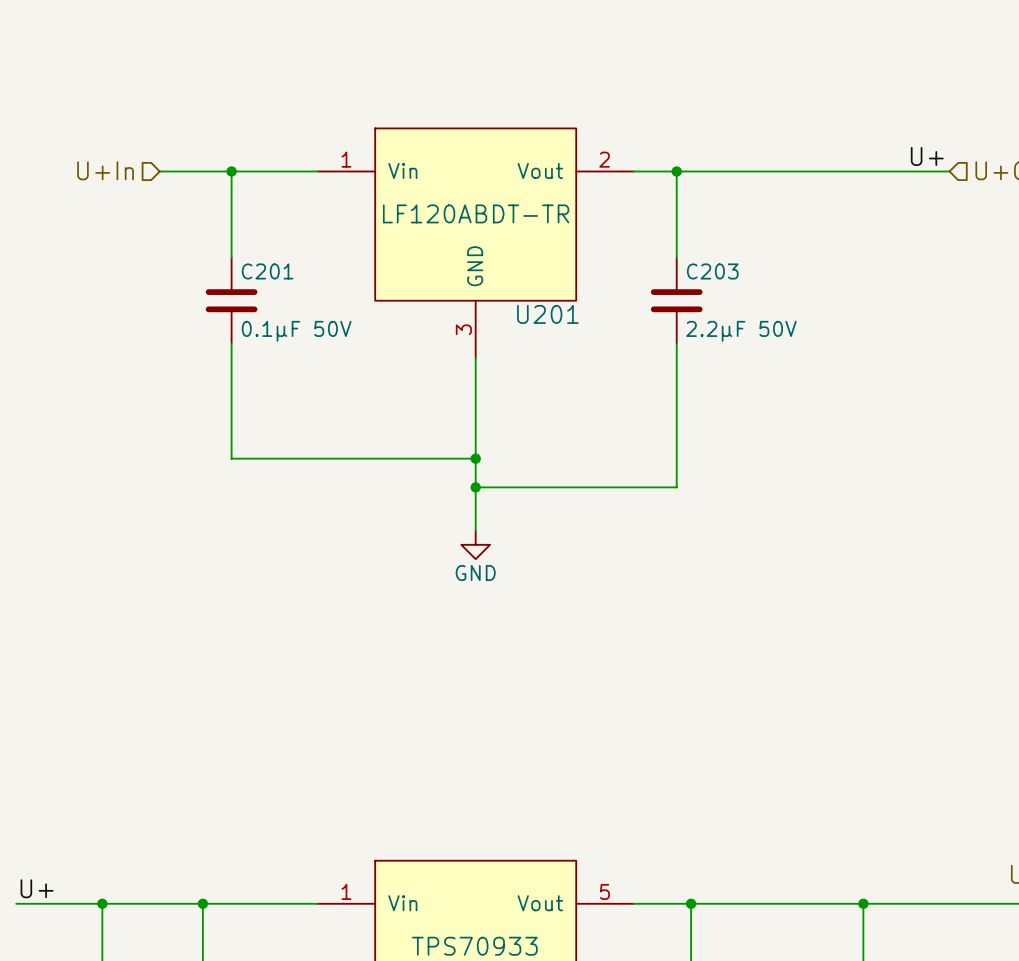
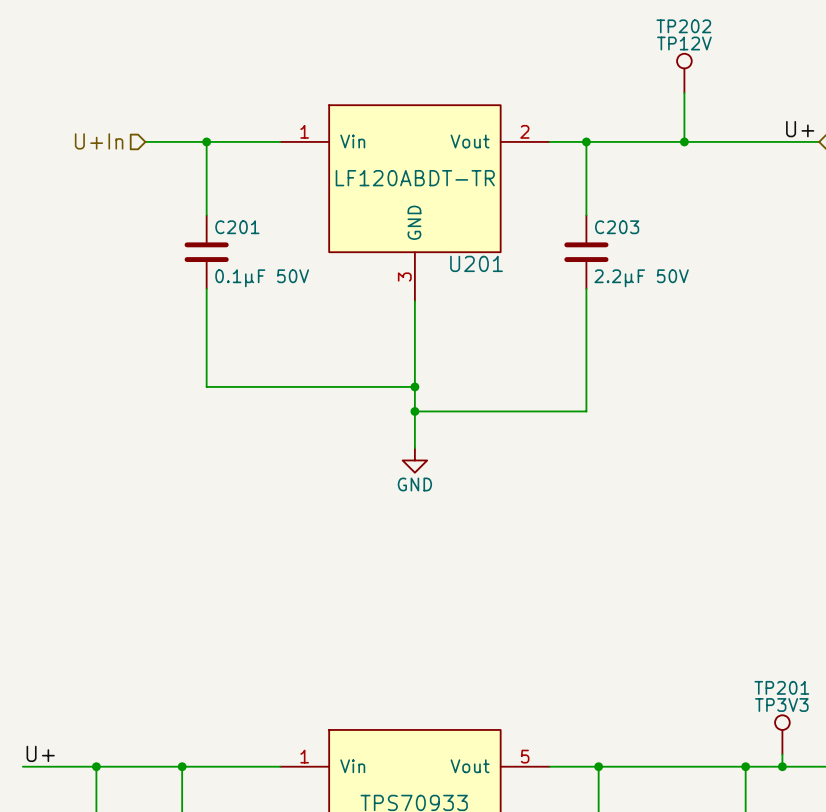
TP202: none -> TP12V (684, 73)
wire: none -> (684, 92) (684, 141)
junction: none -> (684, 141)
TP201: none -> TP3V3 (782, 734)
wire: none -> (782, 754) (782, 766)
junction: none -> (782, 766)

